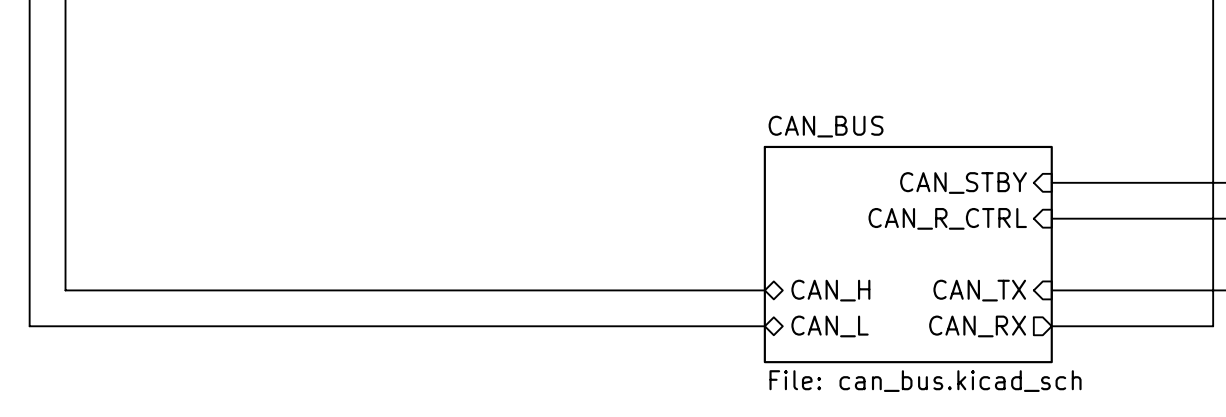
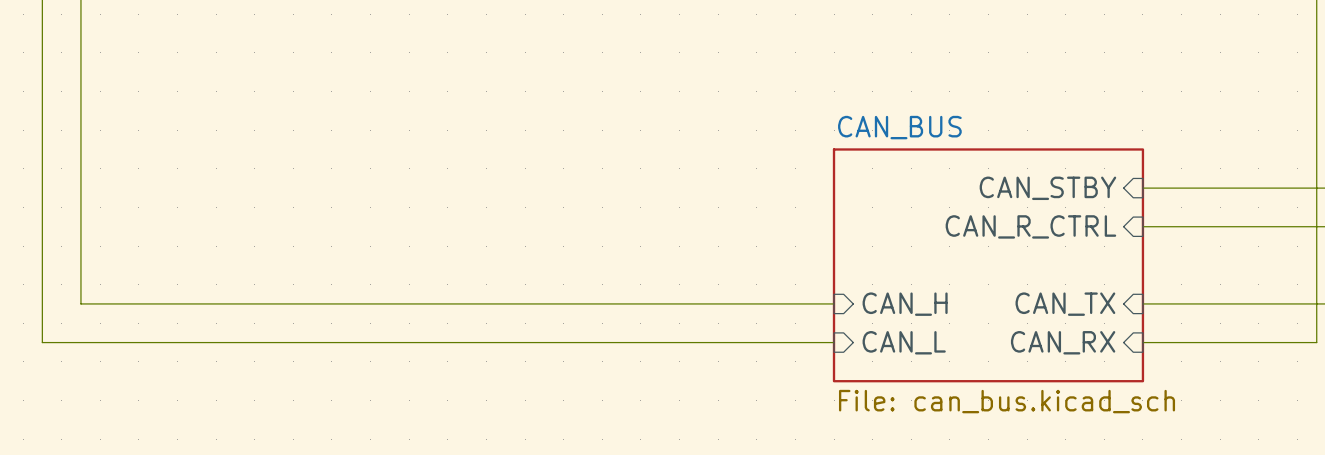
sheet pin shape: bidirectional (830, 290) -> input (905, 304)
sheet pin shape: bidirectional (830, 326) -> input (904, 342)
sheet pin shape: output (977, 326) -> input (1063, 342)

